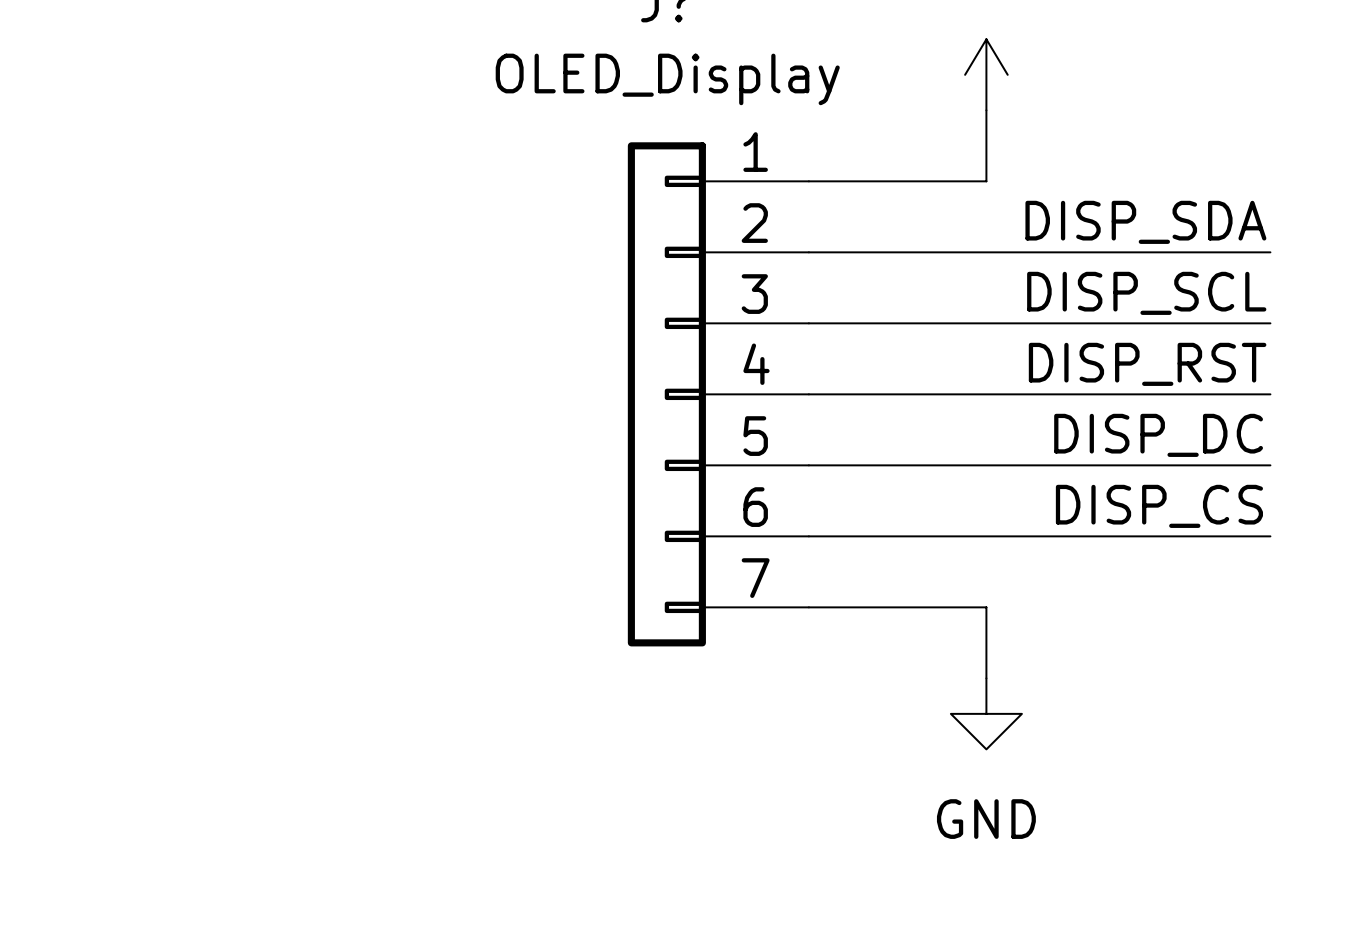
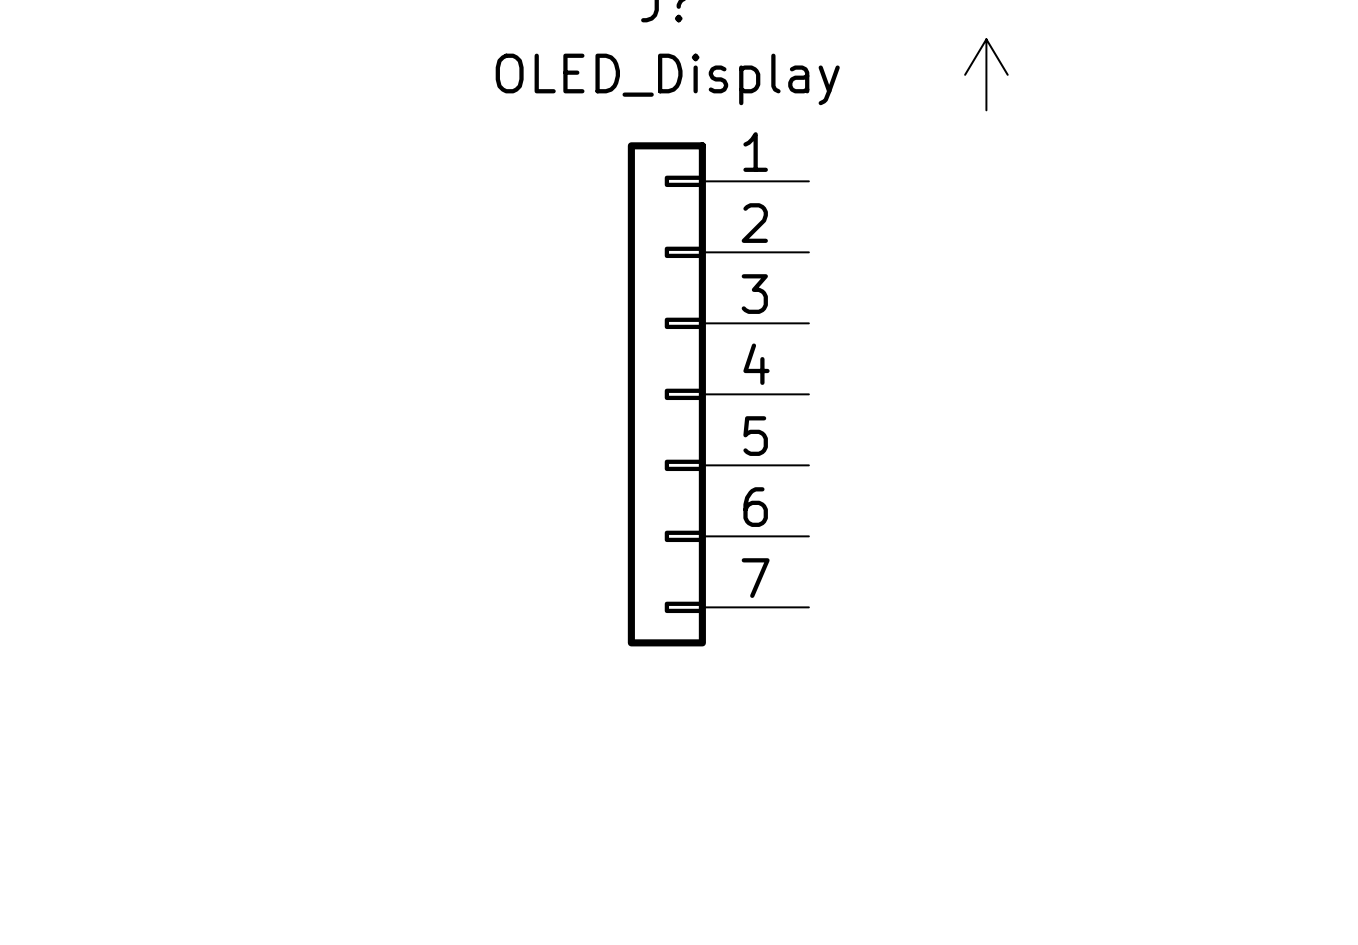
wire: (986, 110) (986, 181) (808, 181) -> none
label: DISP_SDA (1145, 222) -> none
wire: (808, 252) (1270, 252) -> none
label: DISP_SCL (1146, 293) -> none
wire: (808, 323) (1270, 323) -> none
label: DISP_RST (1147, 364) -> none
wire: (808, 394) (1270, 394) -> none
label: DISP_DC (1158, 435) -> none
wire: (808, 465) (1270, 465) -> none
label: DISP_CS (1159, 506) -> none
wire: (808, 536) (1270, 536) -> none
wire: (808, 607) (986, 607) (986, 678) -> none
power symbol: GND (986, 713) -> none

